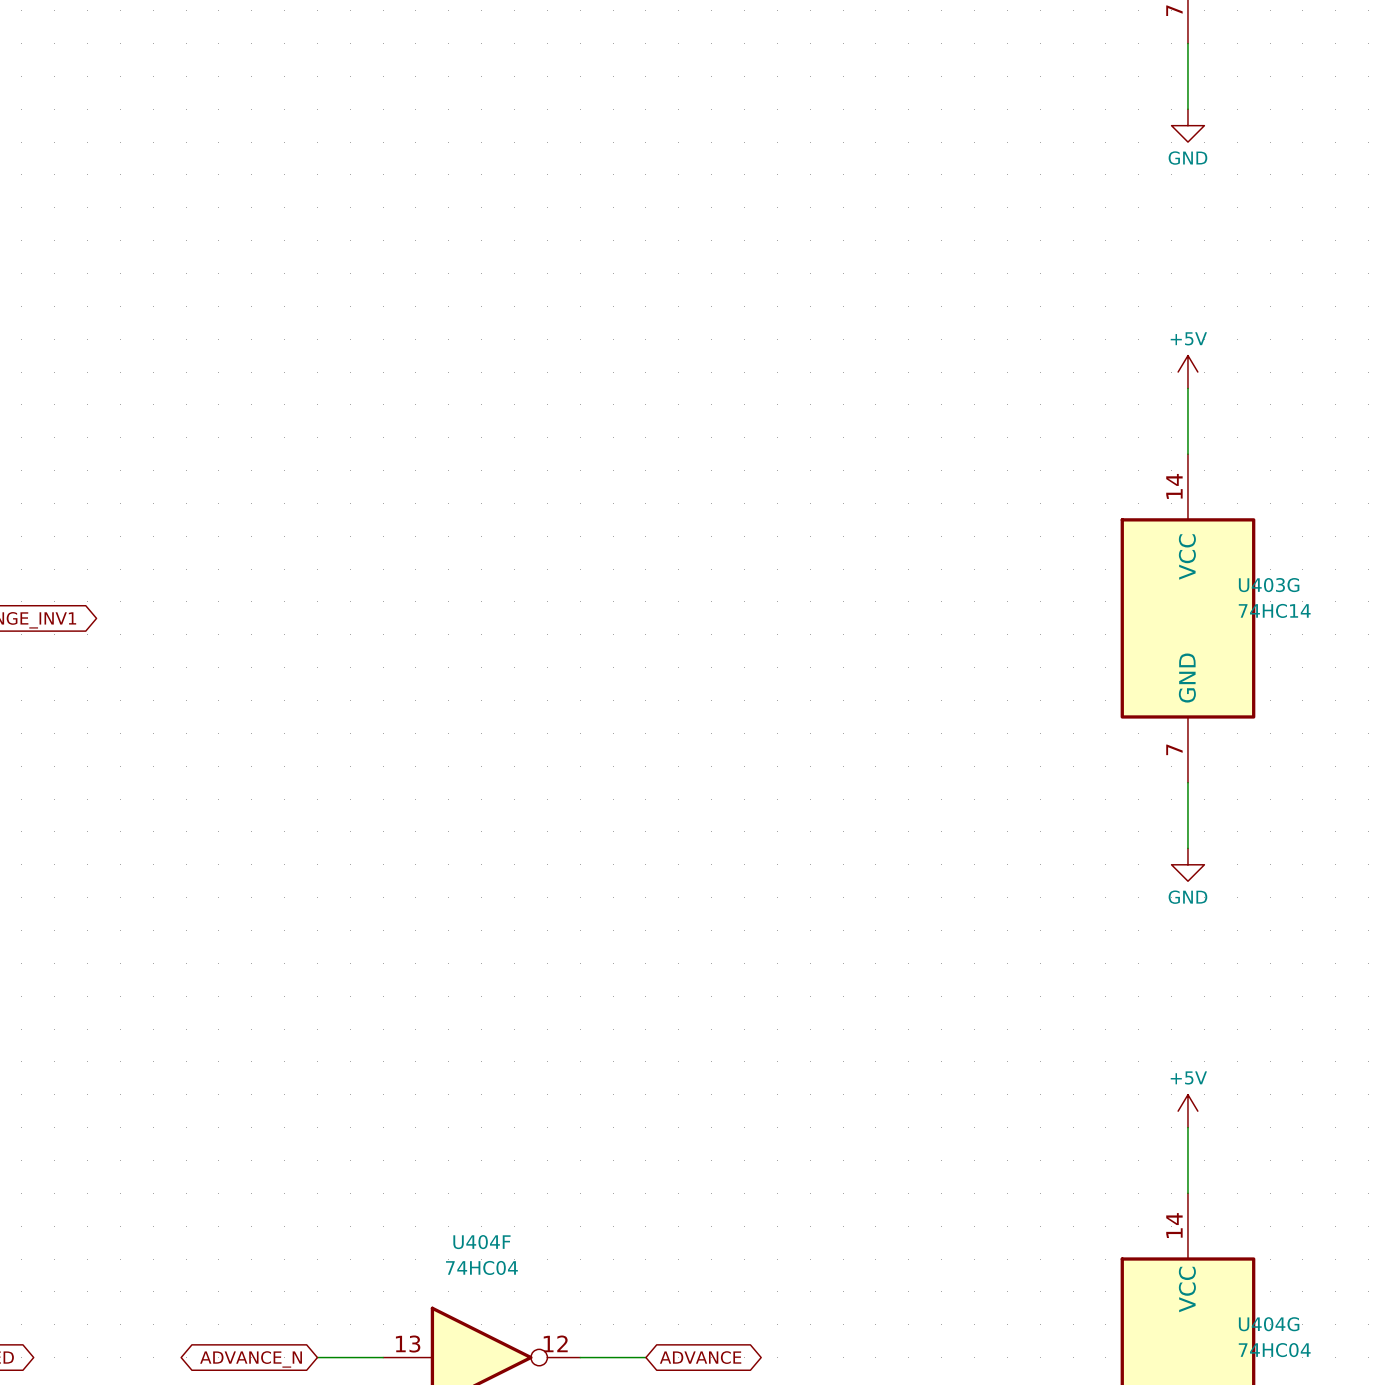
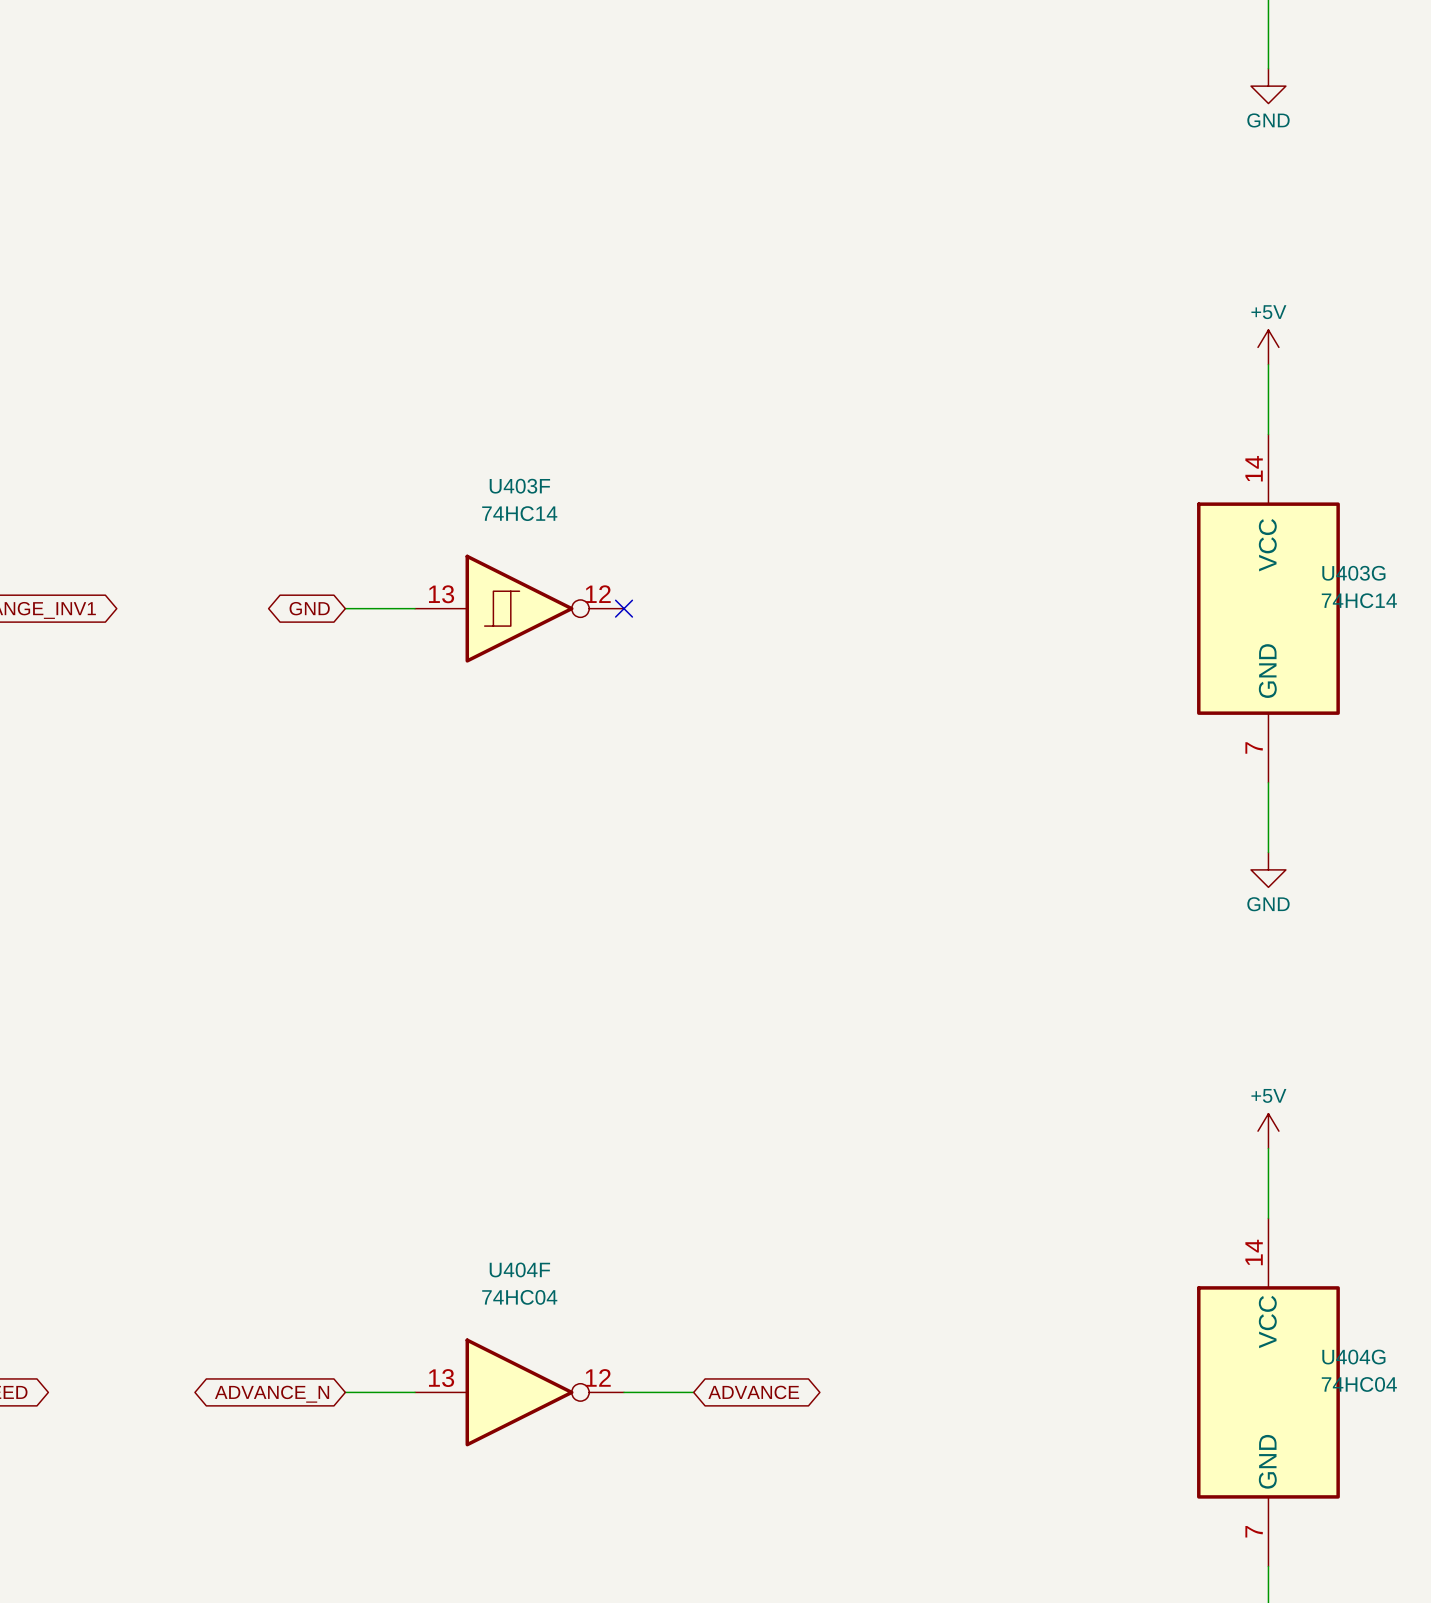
global label: none -> GND (309, 608)
wire: none -> (345, 608) (415, 608)
U403F: none -> 74HC14 (519, 608)
no-connect mark: none -> (624, 608)

